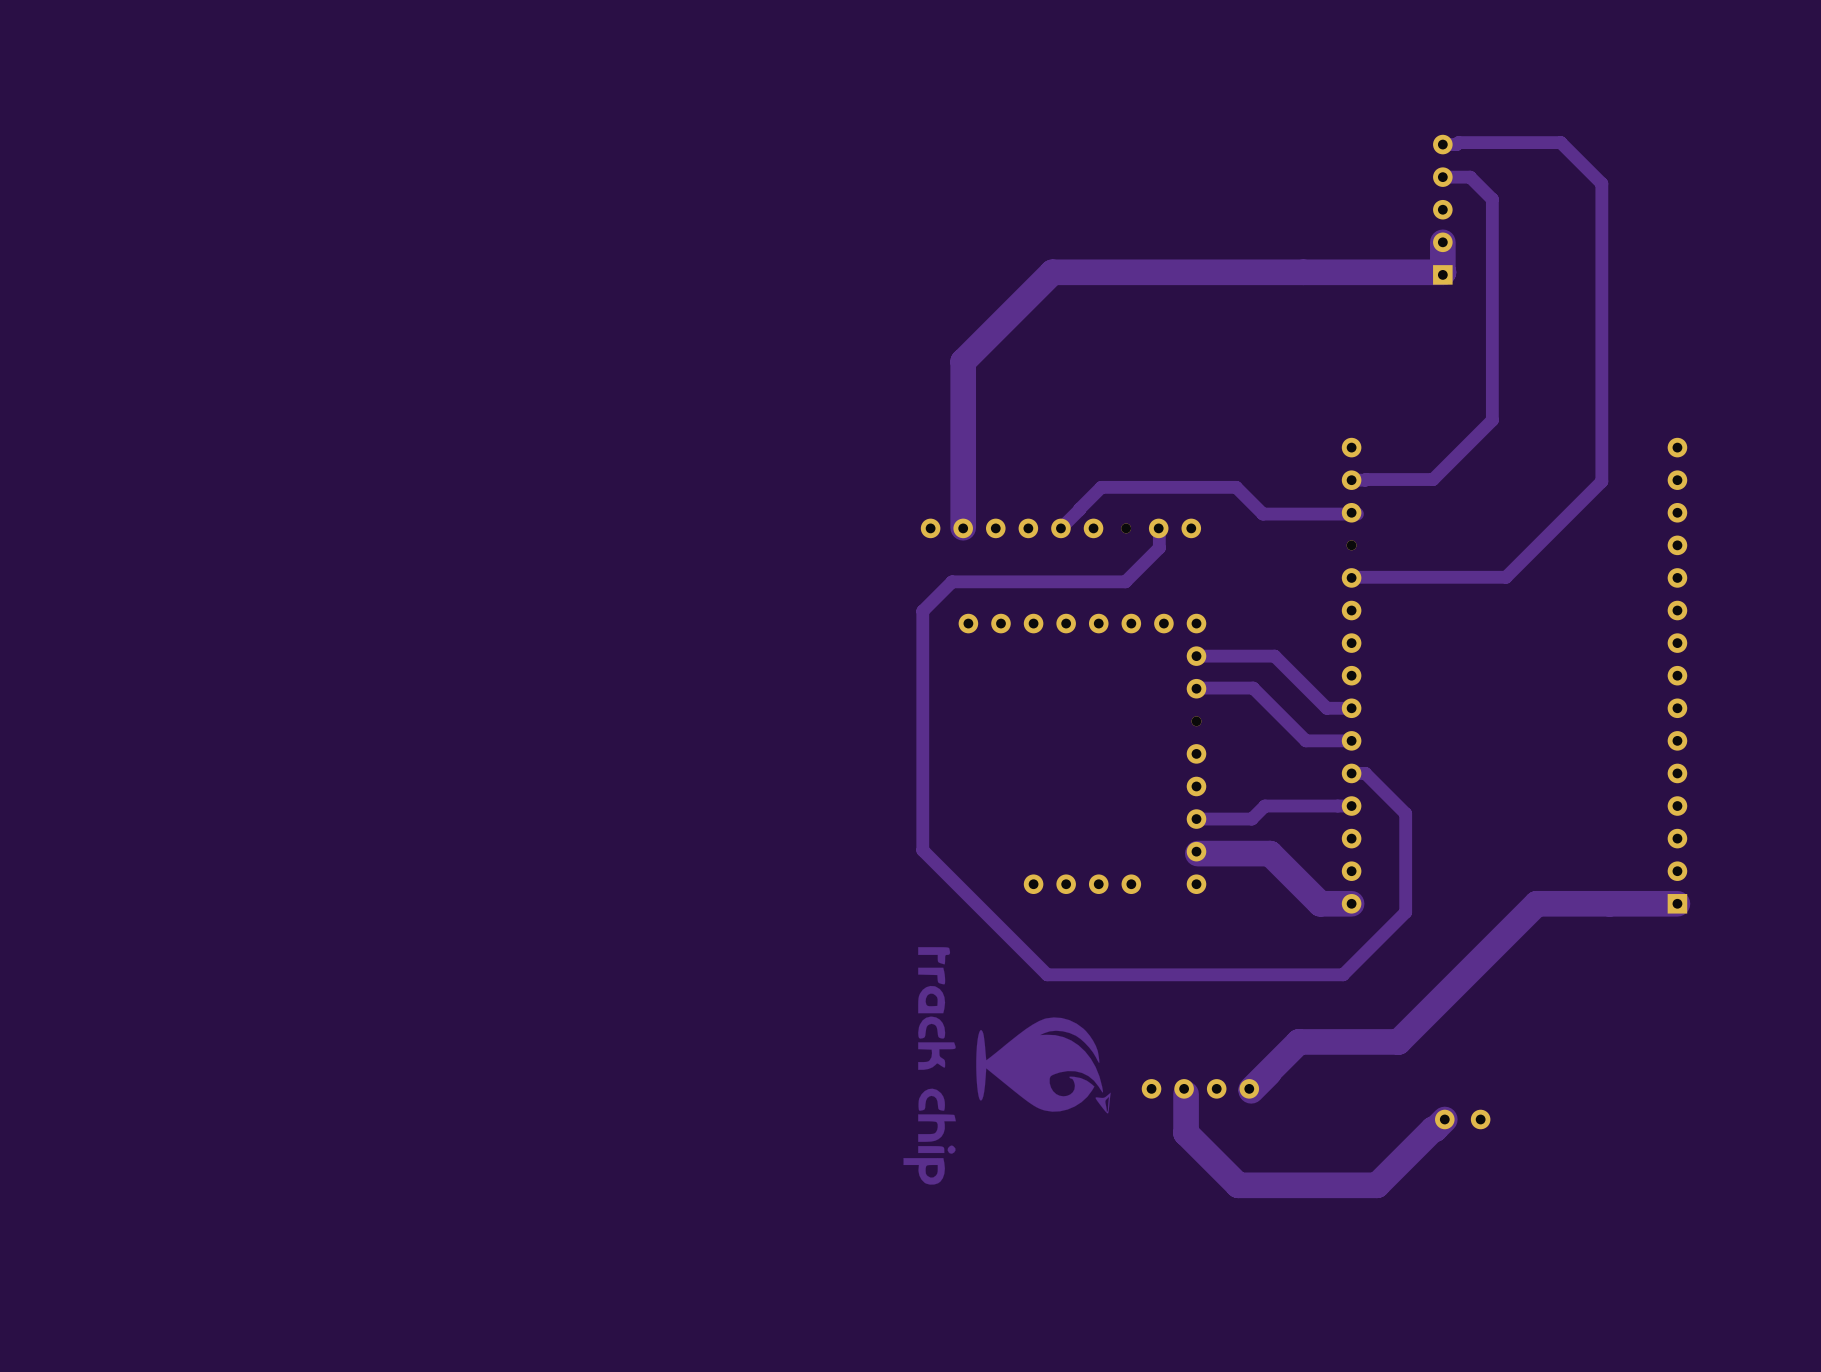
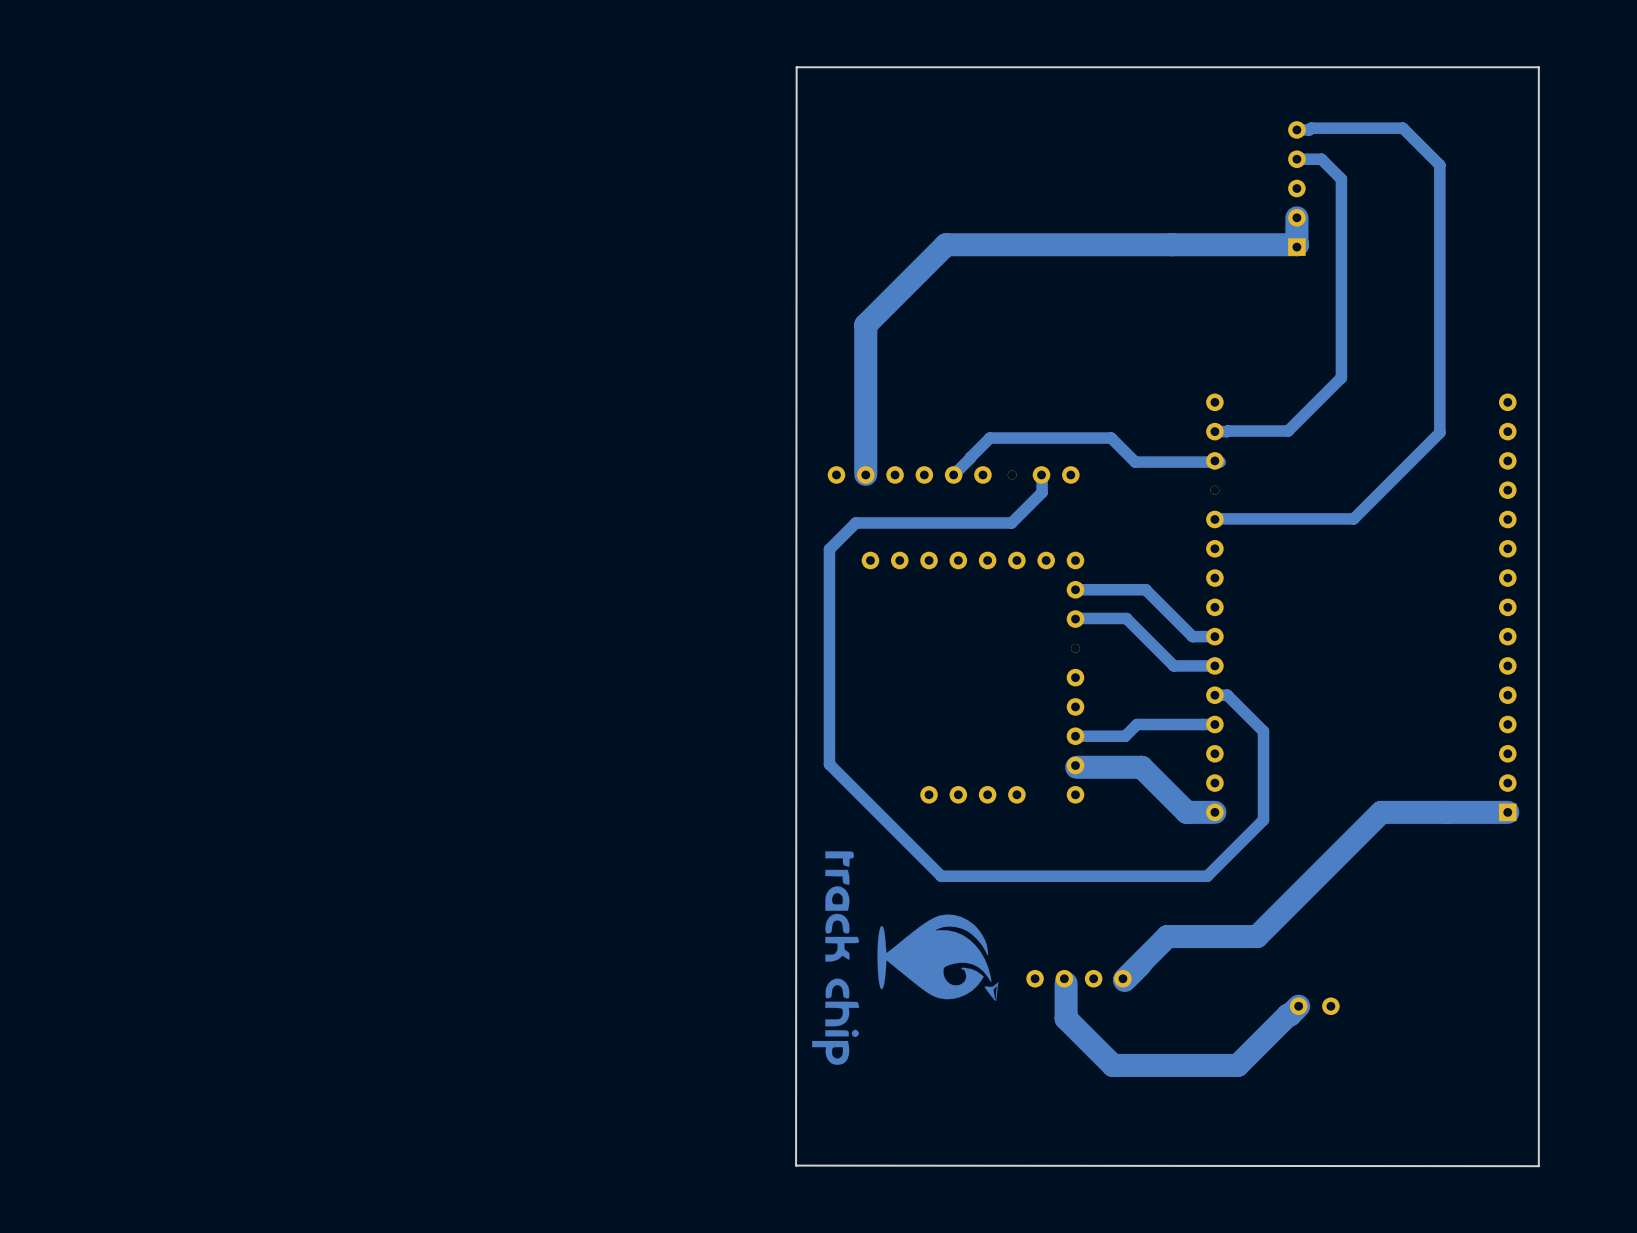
board edge: none -> (1538, 67) (796, 67) (796, 1165) (1538, 1166) (1538, 67)

